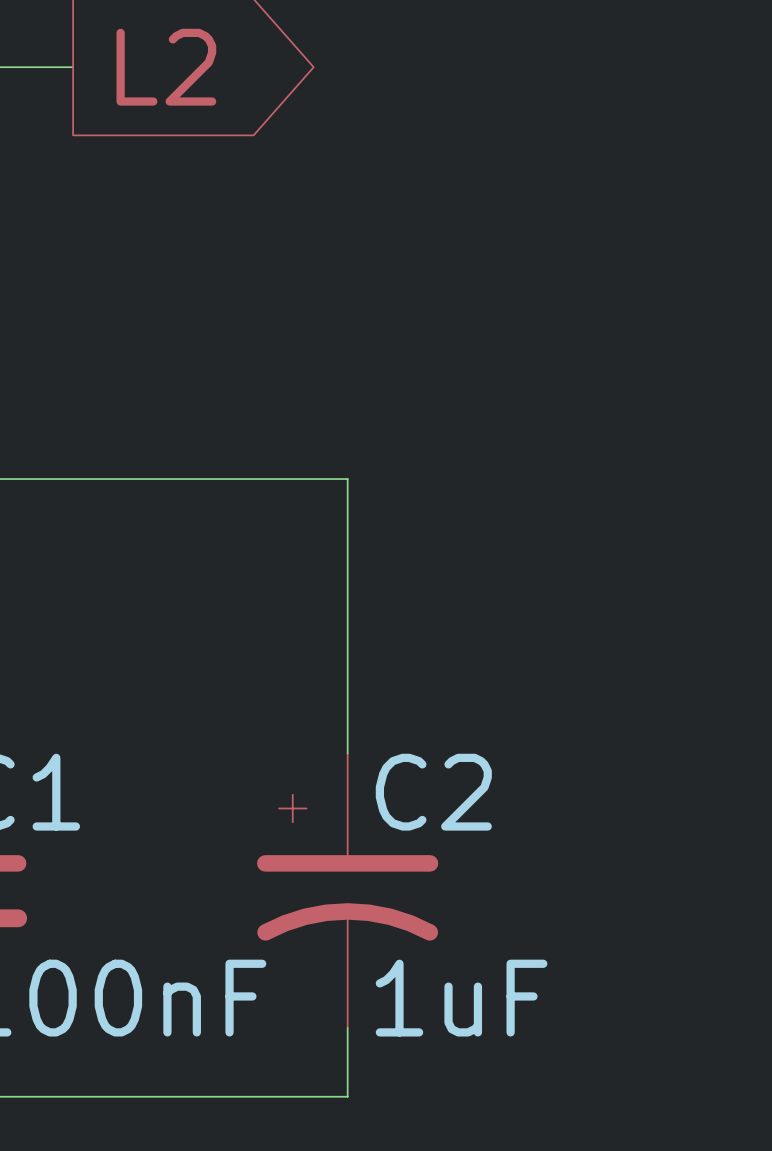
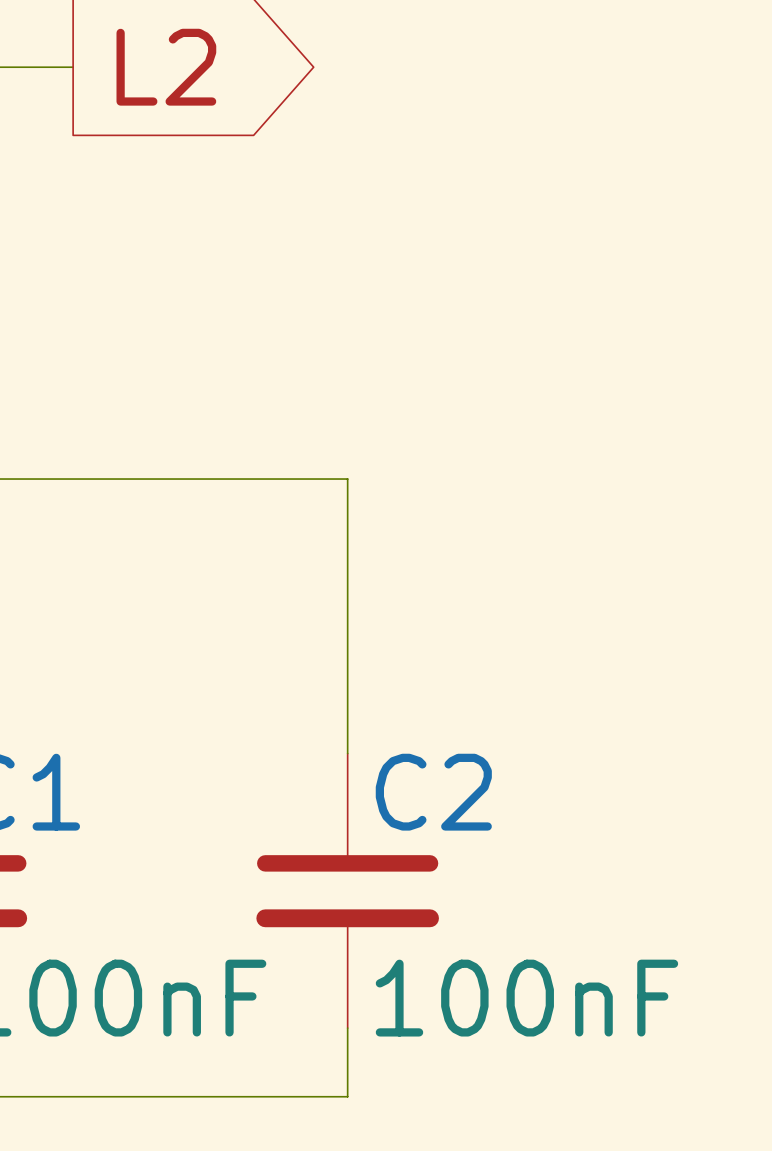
C2 symbol: [257, 753, 439, 1029] -> [256, 753, 439, 1029]
C2 value: 1uF (461, 998) -> 100nF (526, 998)

